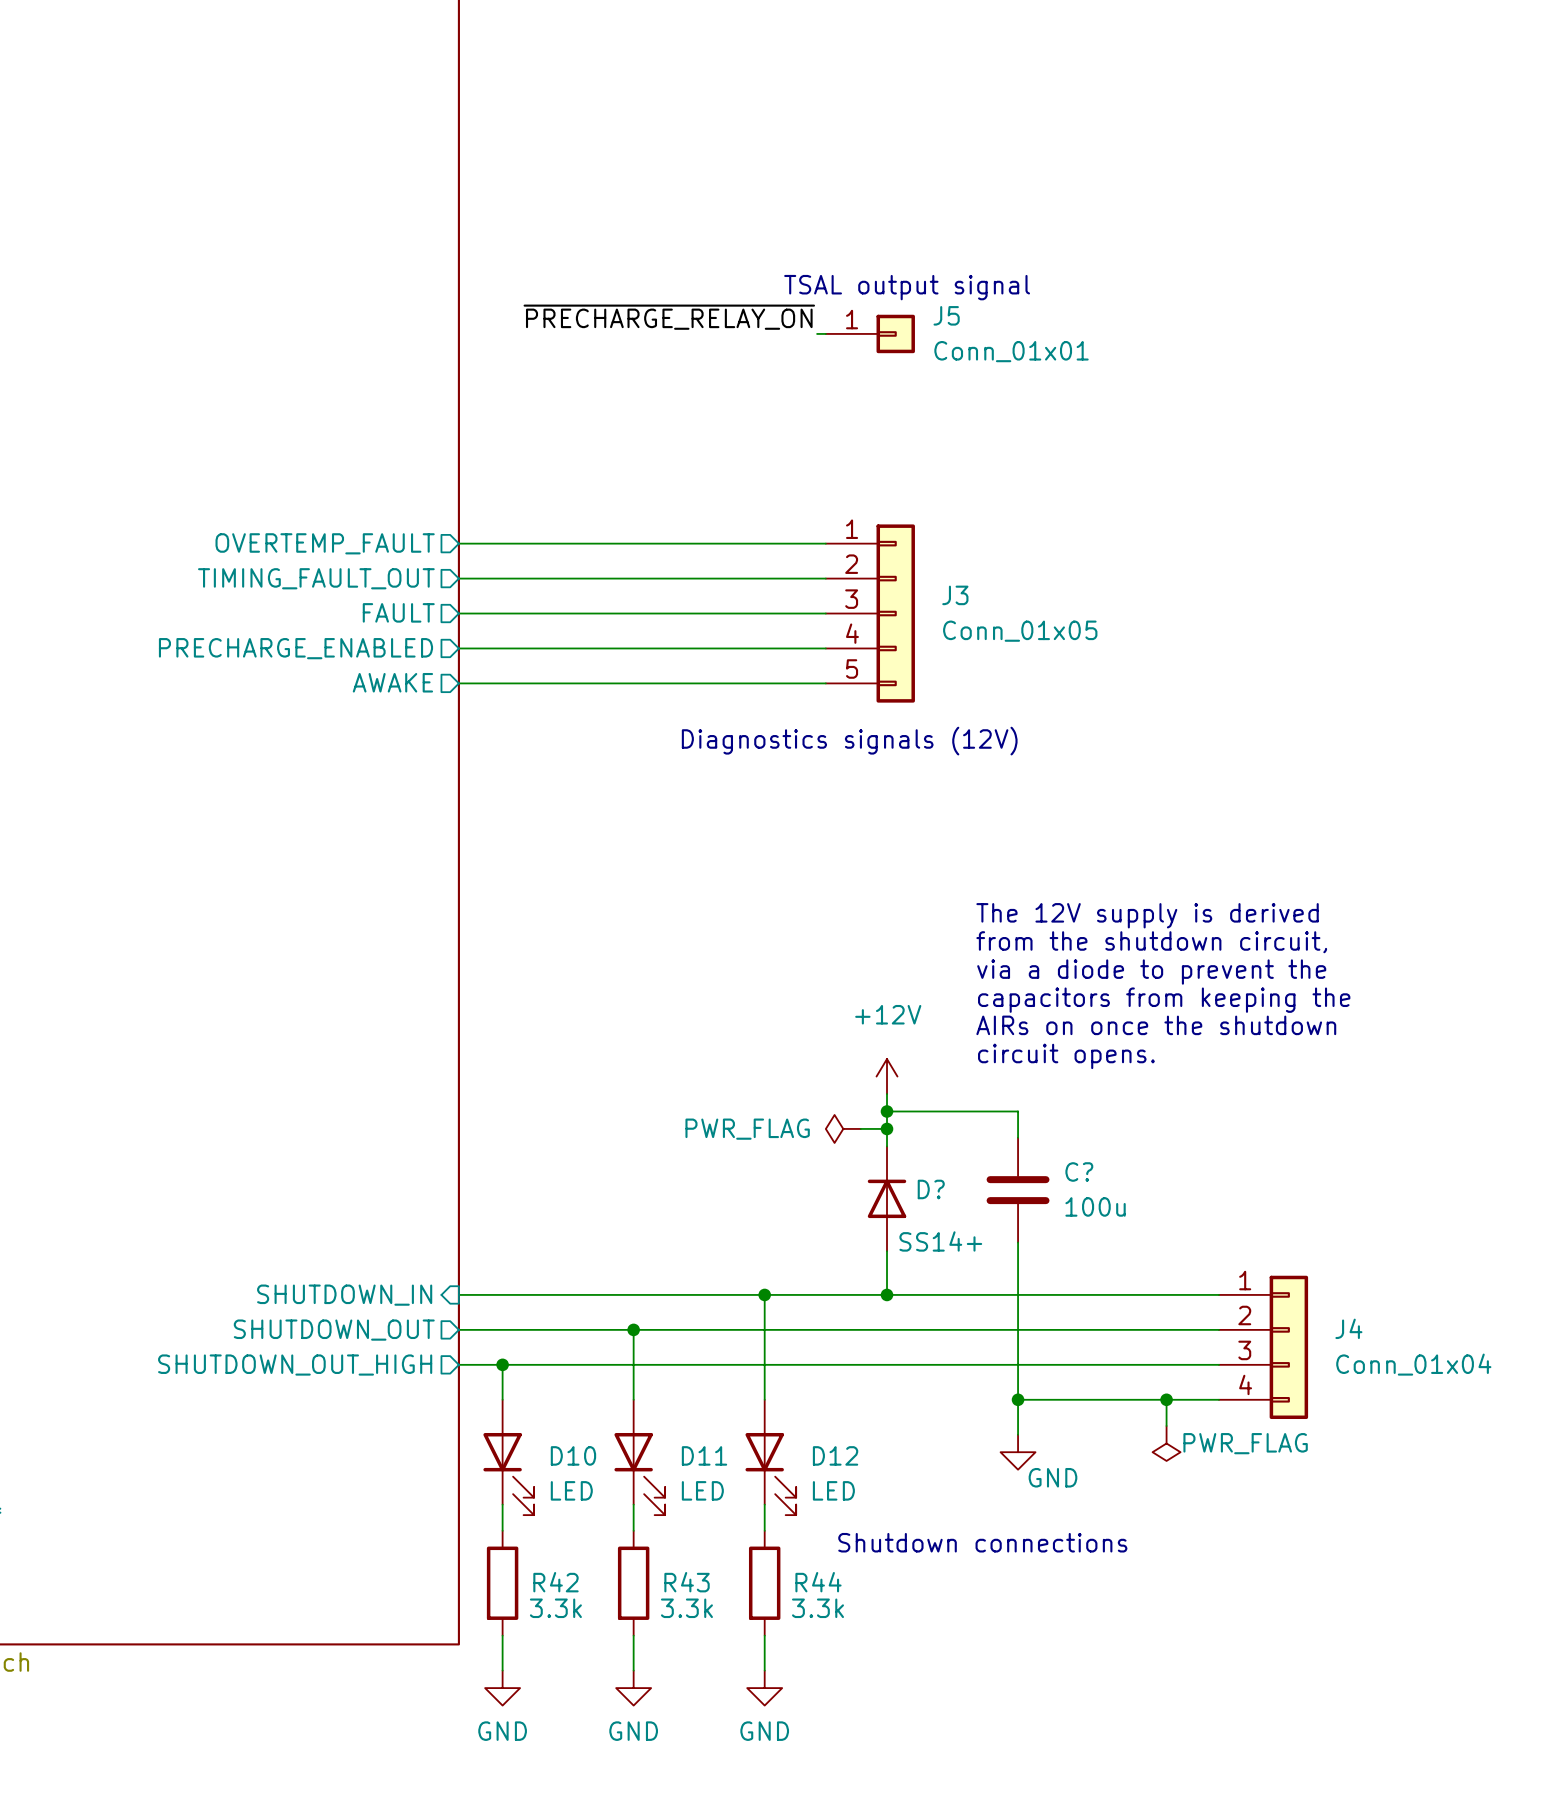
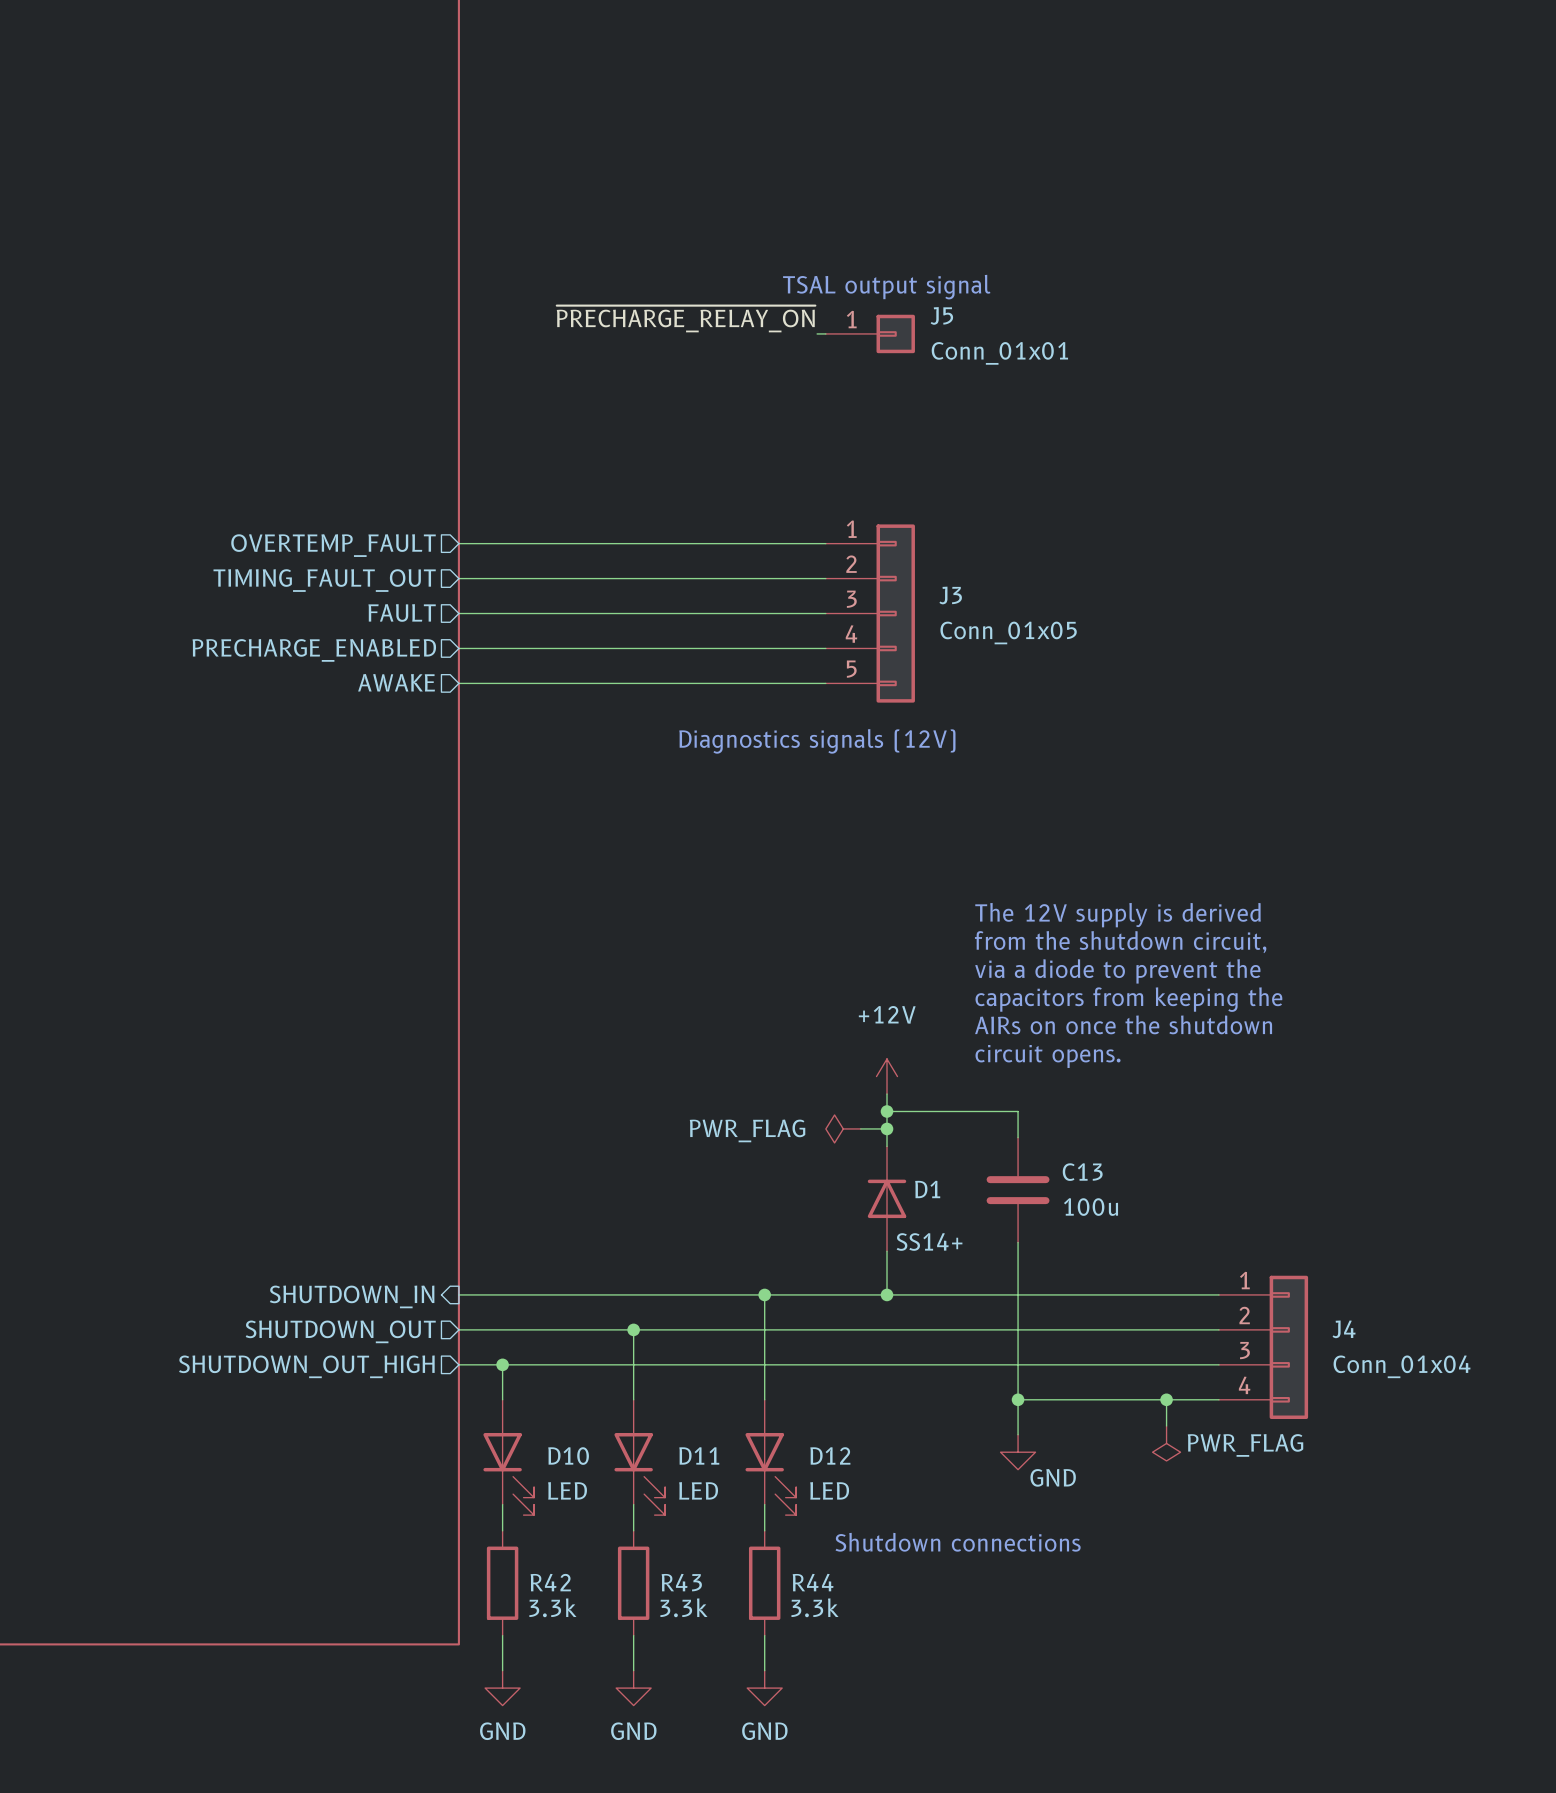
C? name: C? (1079, 1171) -> C13 (1082, 1172)
D? name: D? (931, 1189) -> D1 (927, 1189)

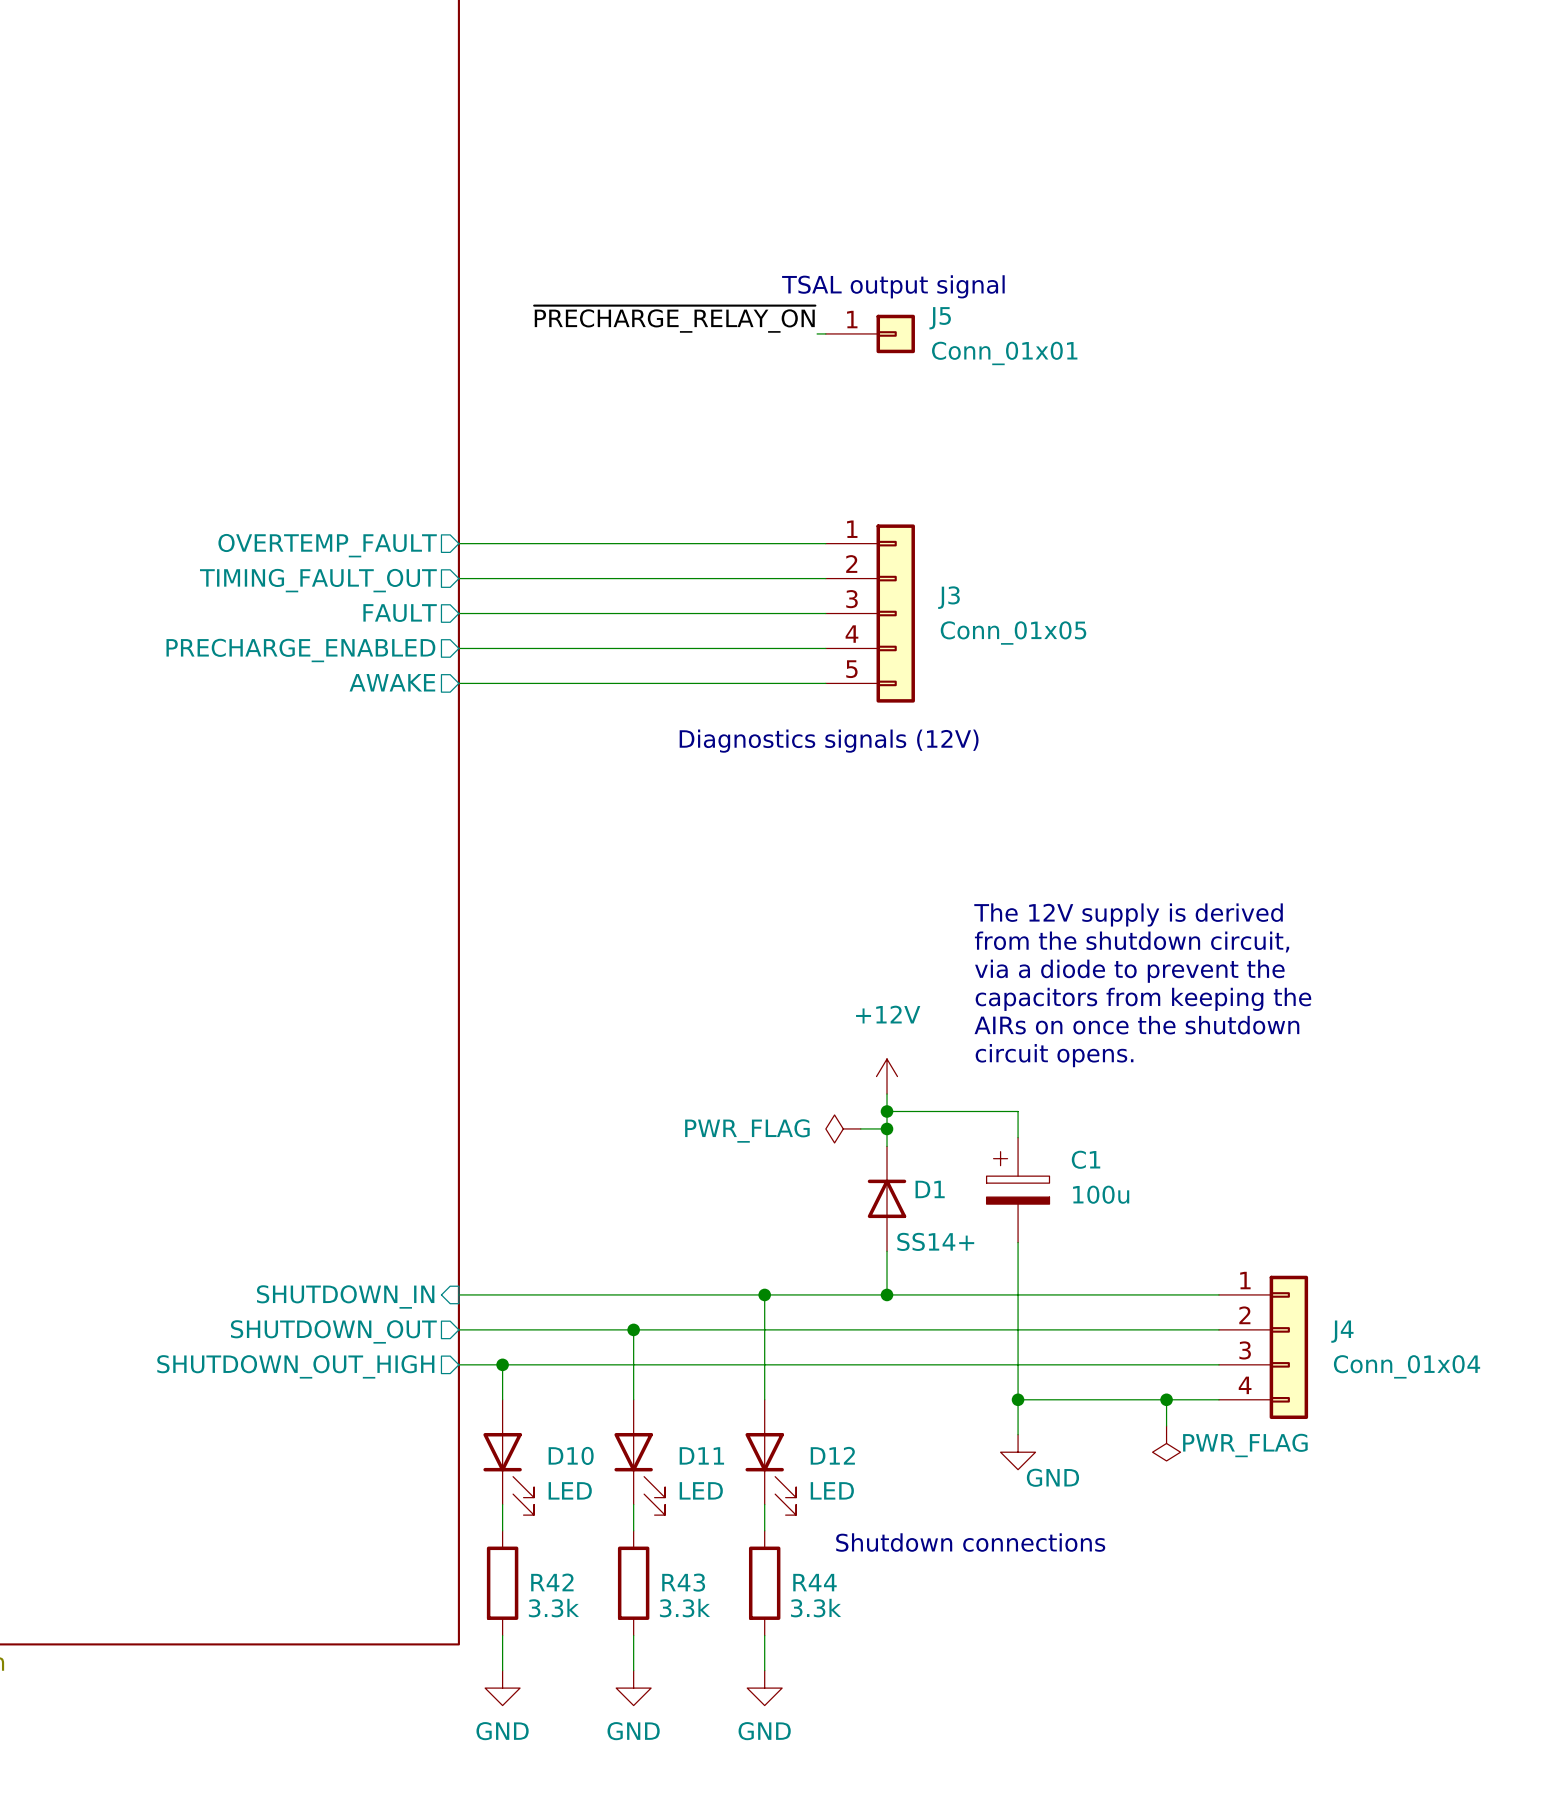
C13: 100u (1018, 1190) -> none
C1: none -> 100u (1018, 1190)

